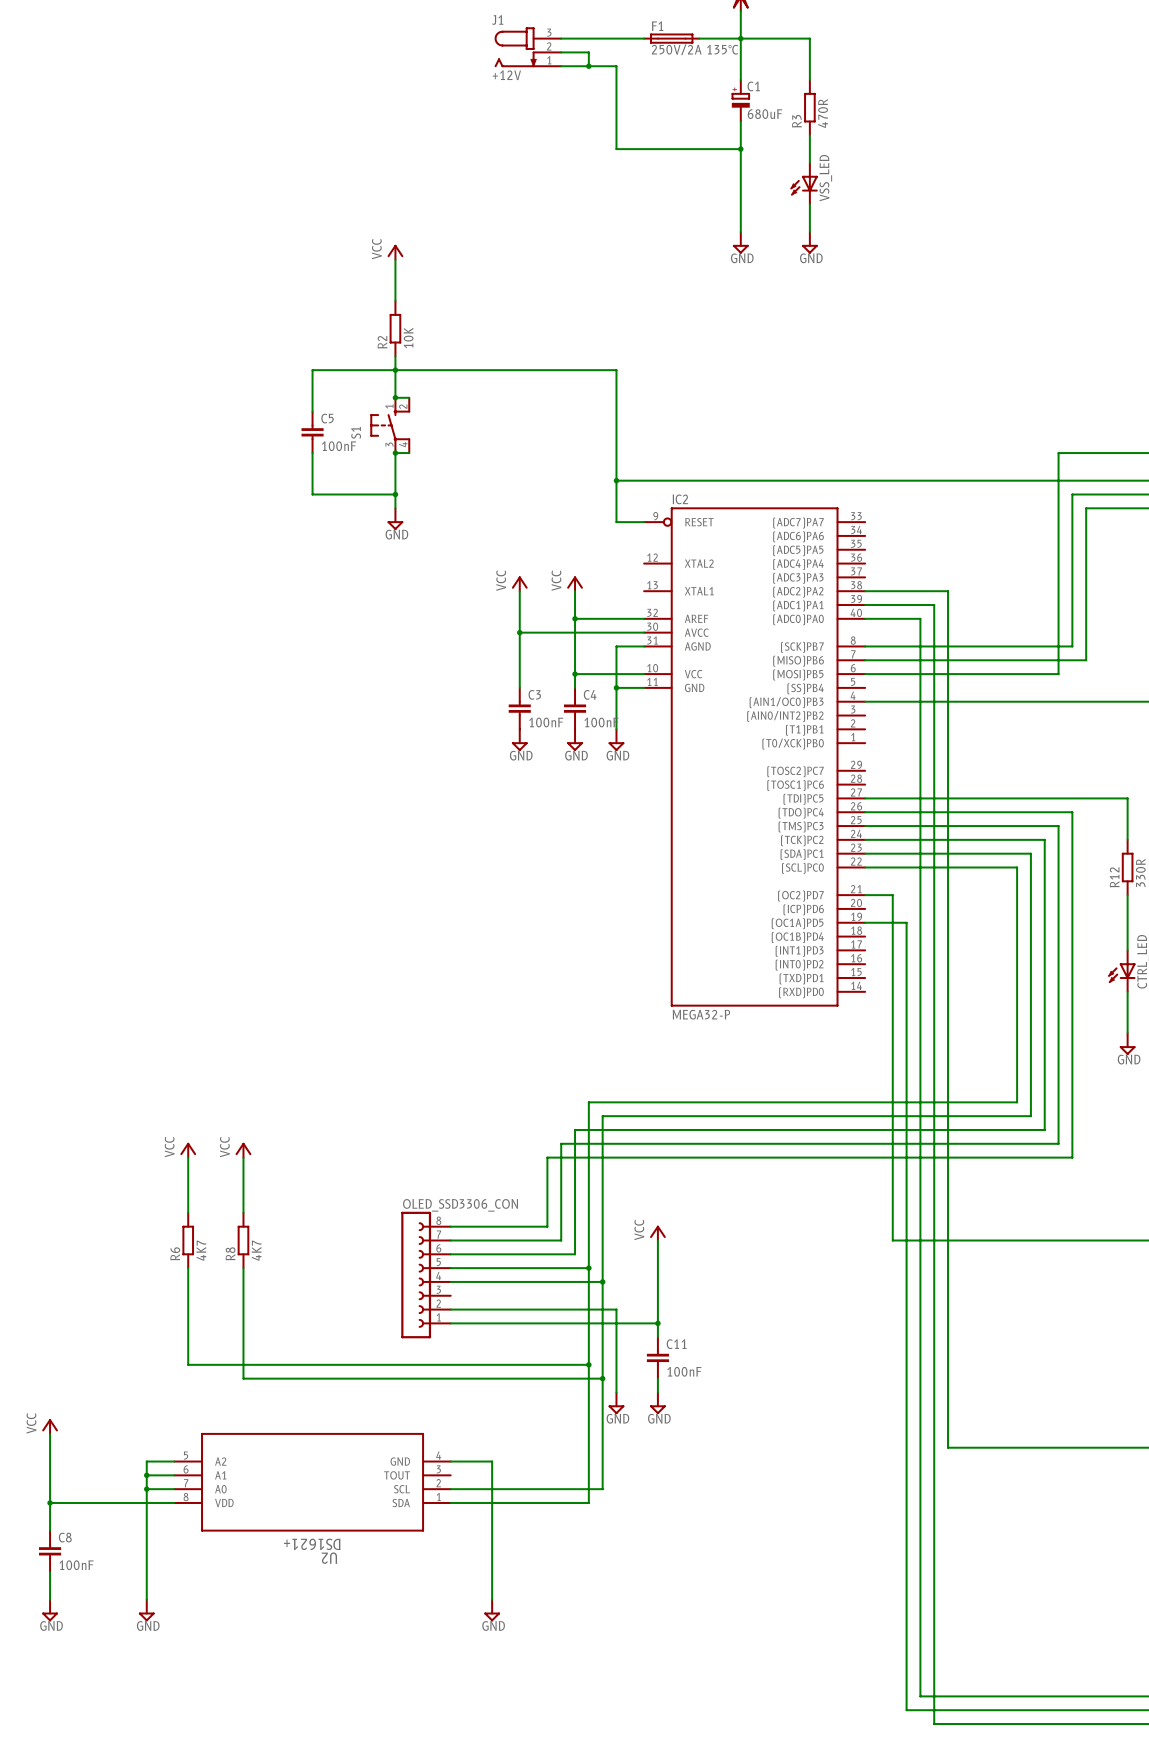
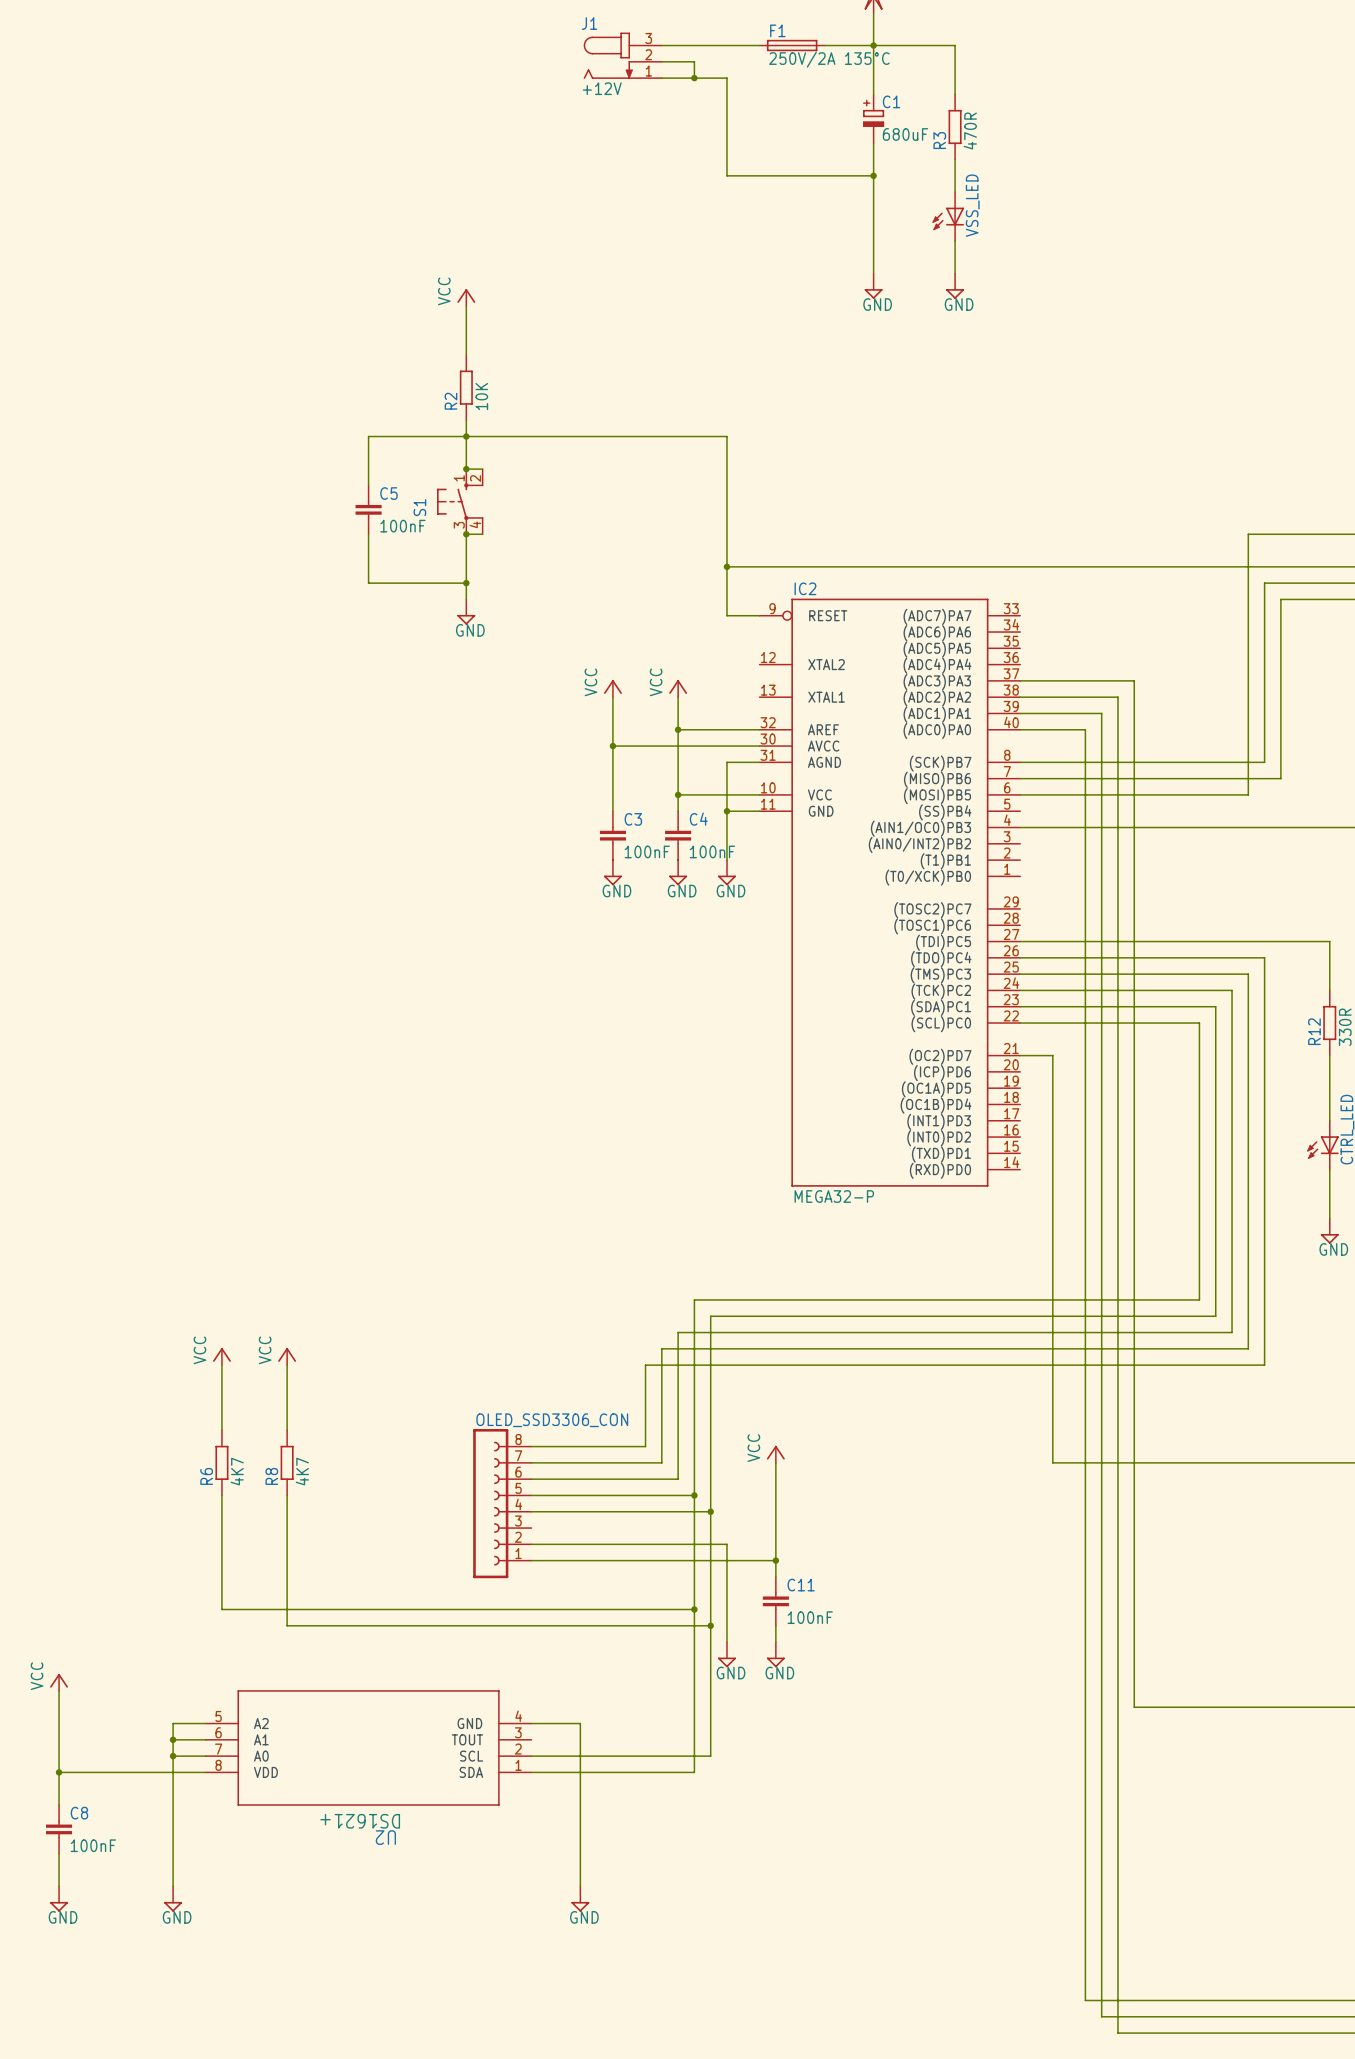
wire: none -> (1020, 680) (1134, 680) (1134, 1707)
wire: (865, 922) (906, 922) (906, 1710) (934, 1710) (934, 1724) (948, 1724) -> none
wire: (948, 1447) (961, 1447) -> (1117, 1707) (1117, 2033)

